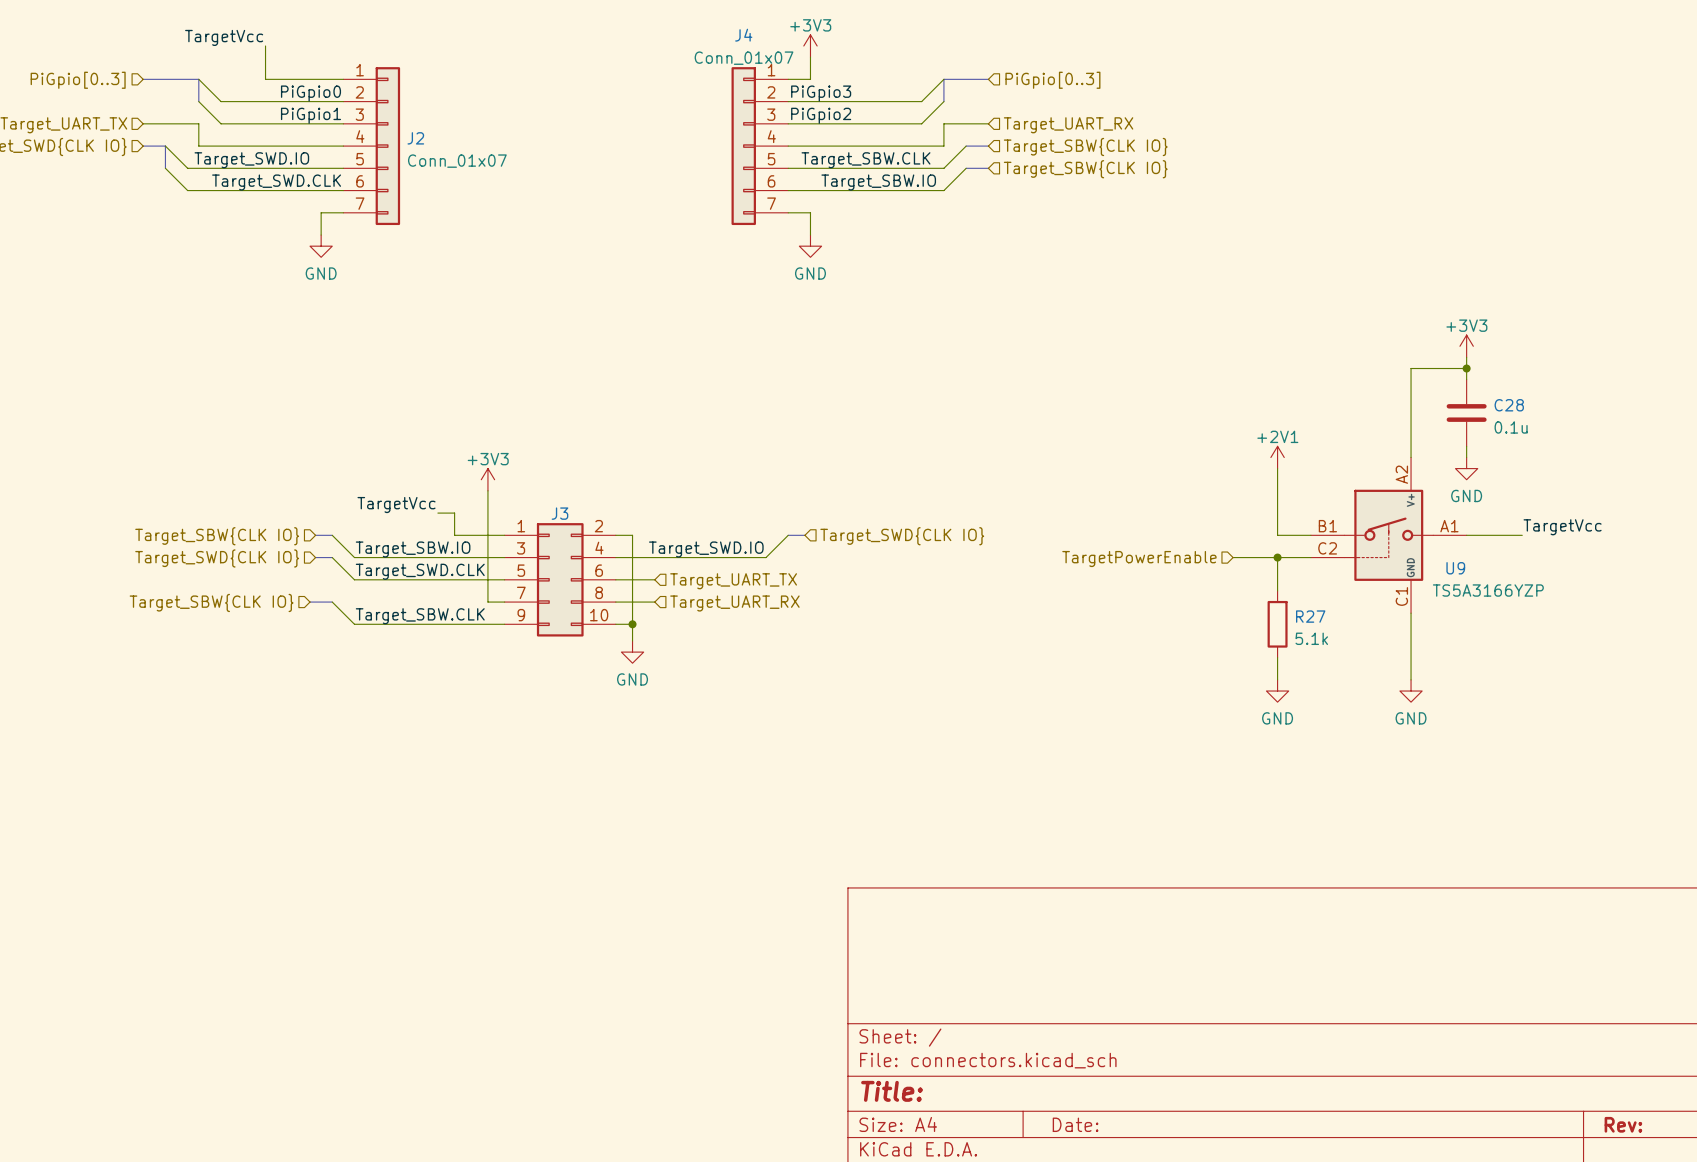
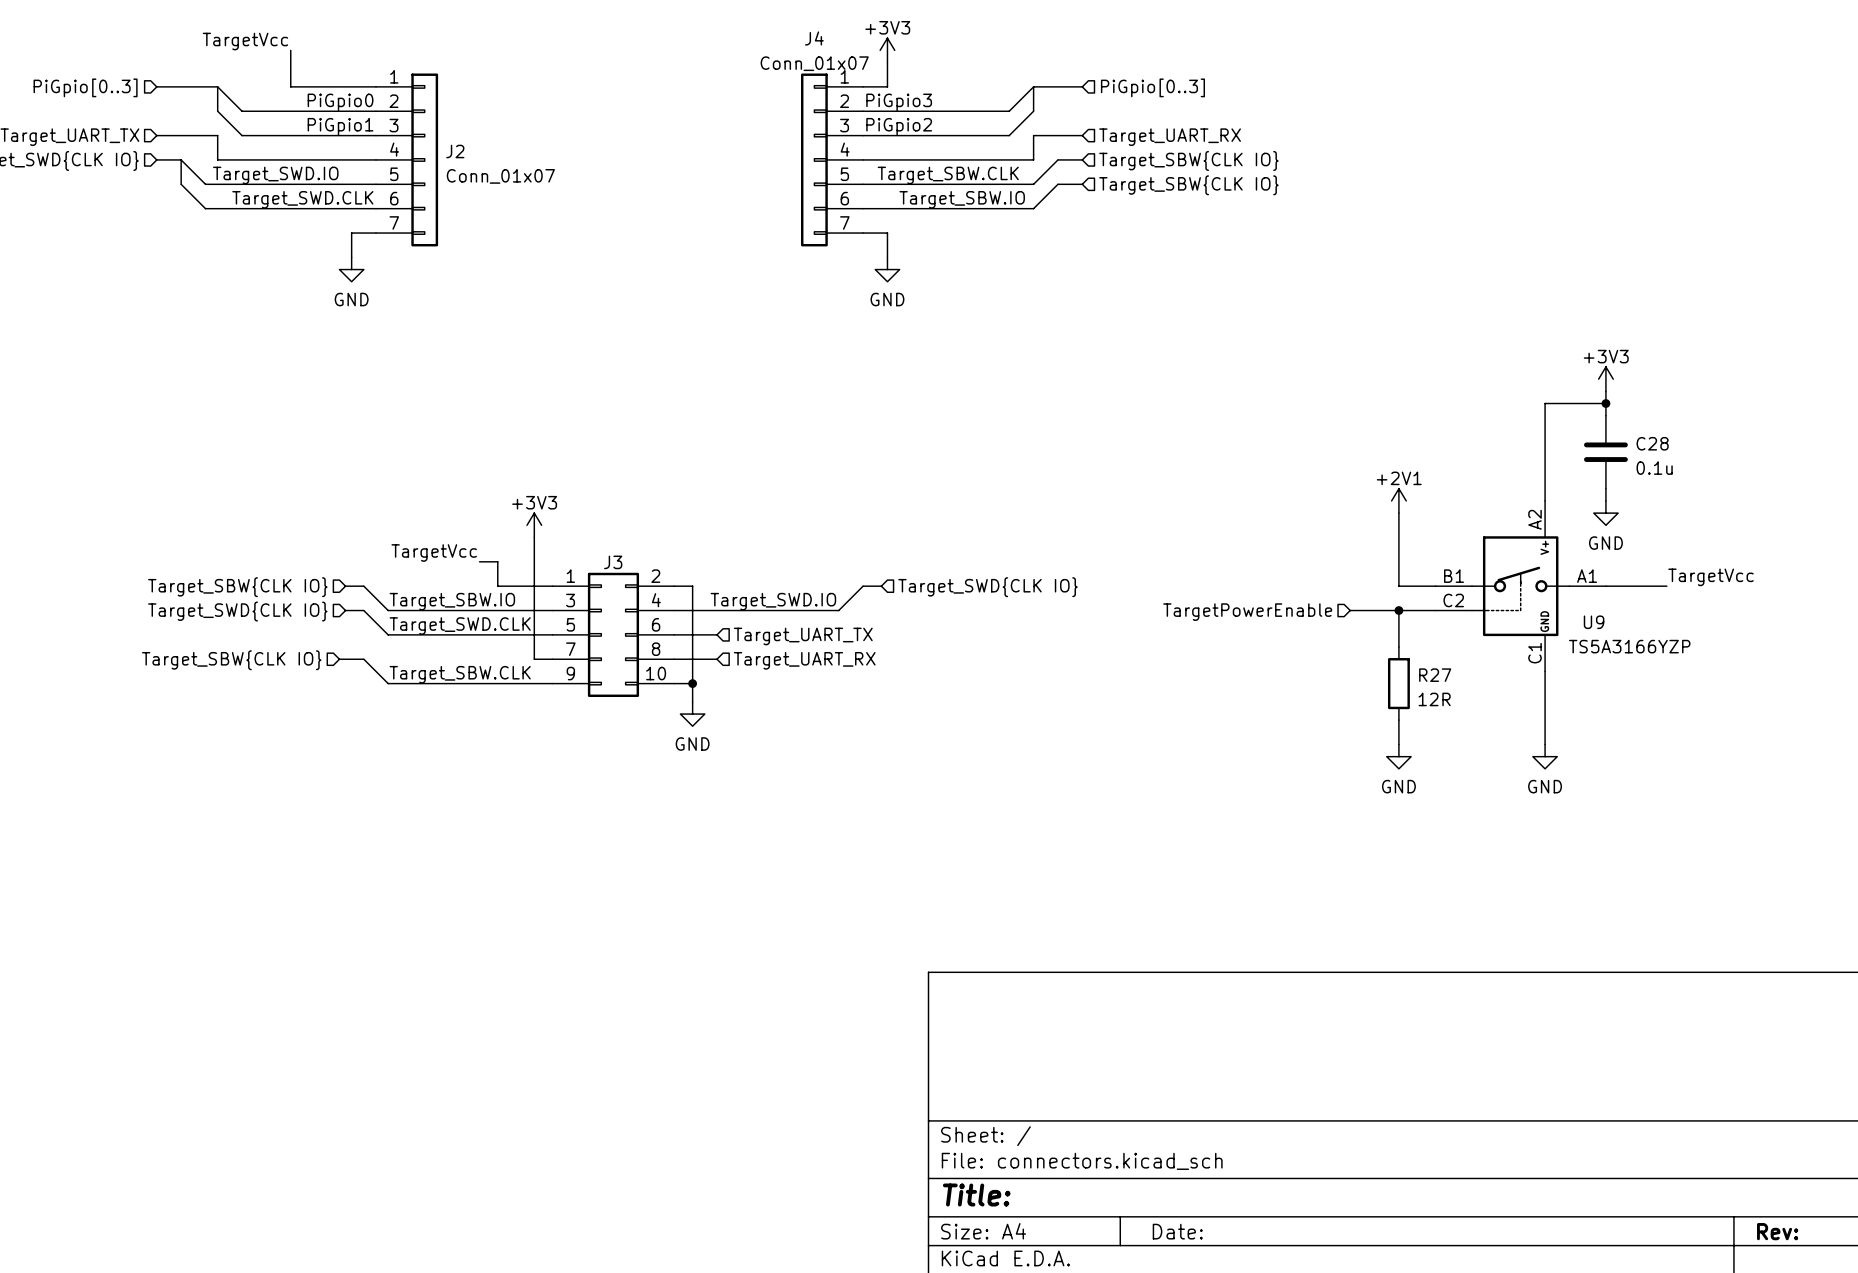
R27 value: 5.1k (1311, 638) -> 12R (1434, 699)

